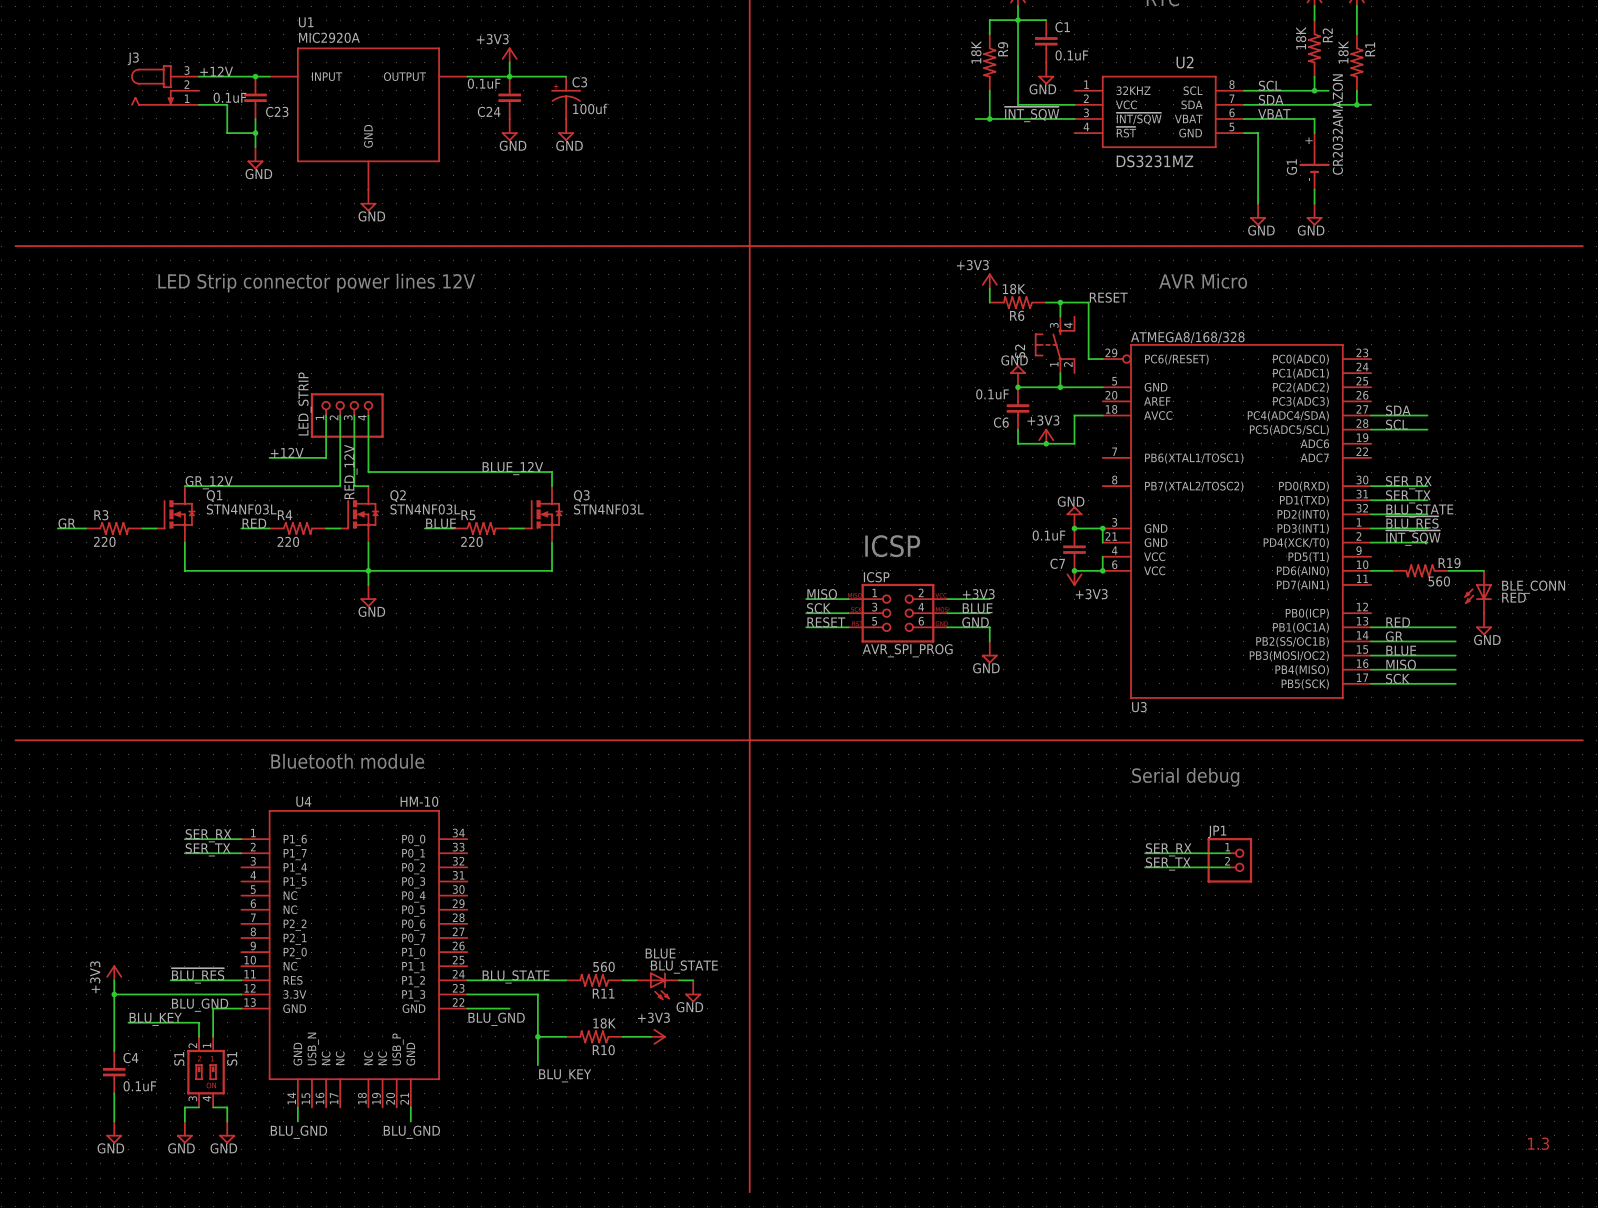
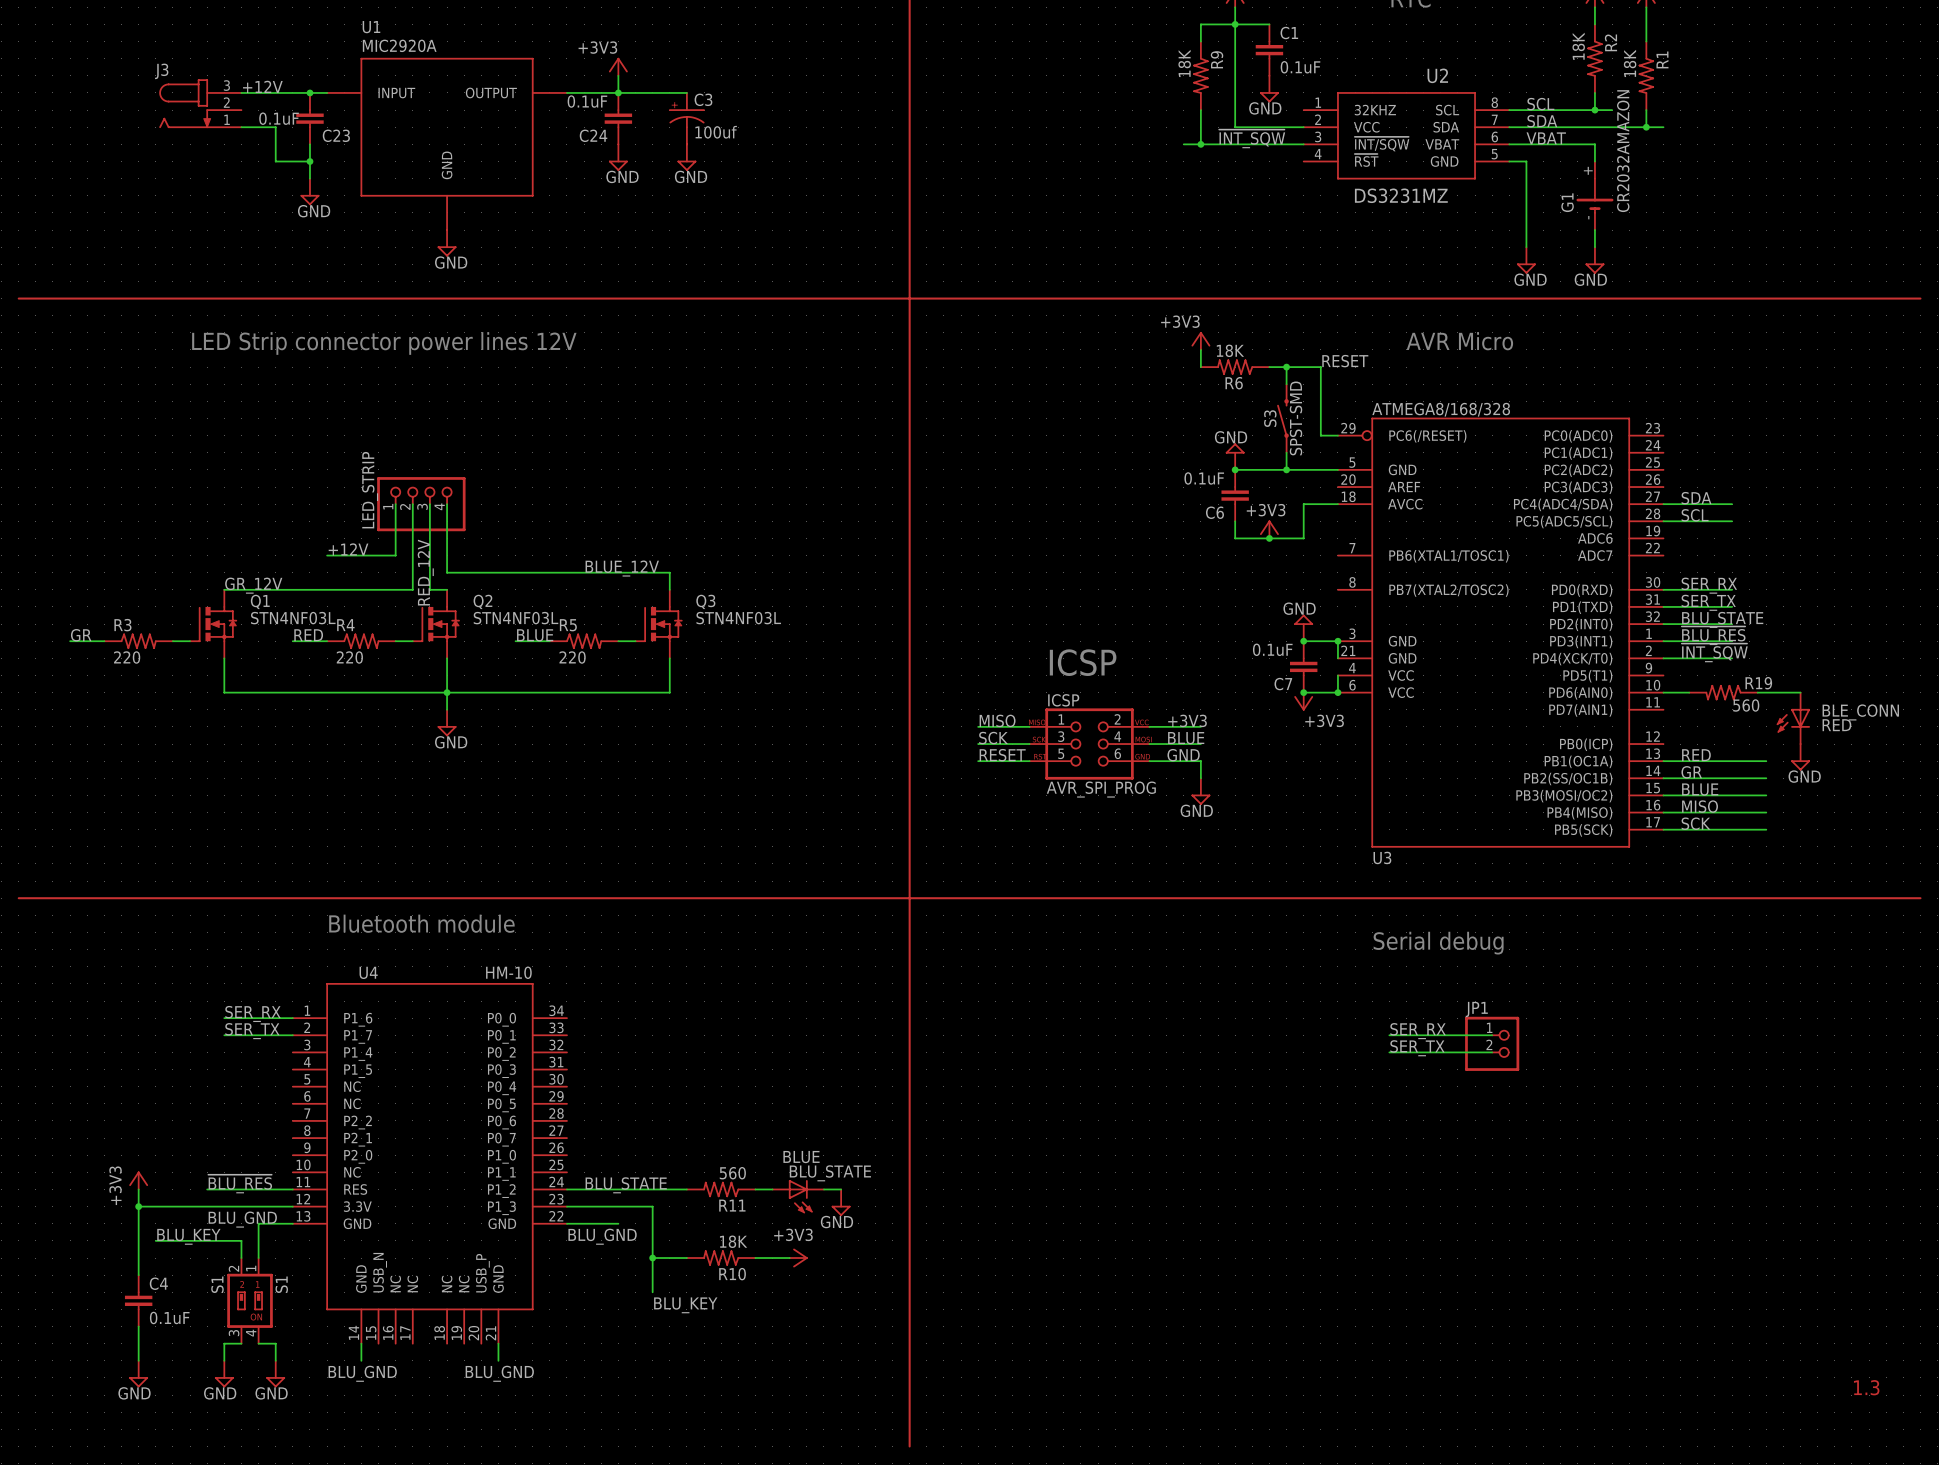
S2: (1054, 344) -> none
S3: none -> SPST-SMD (1282, 418)

